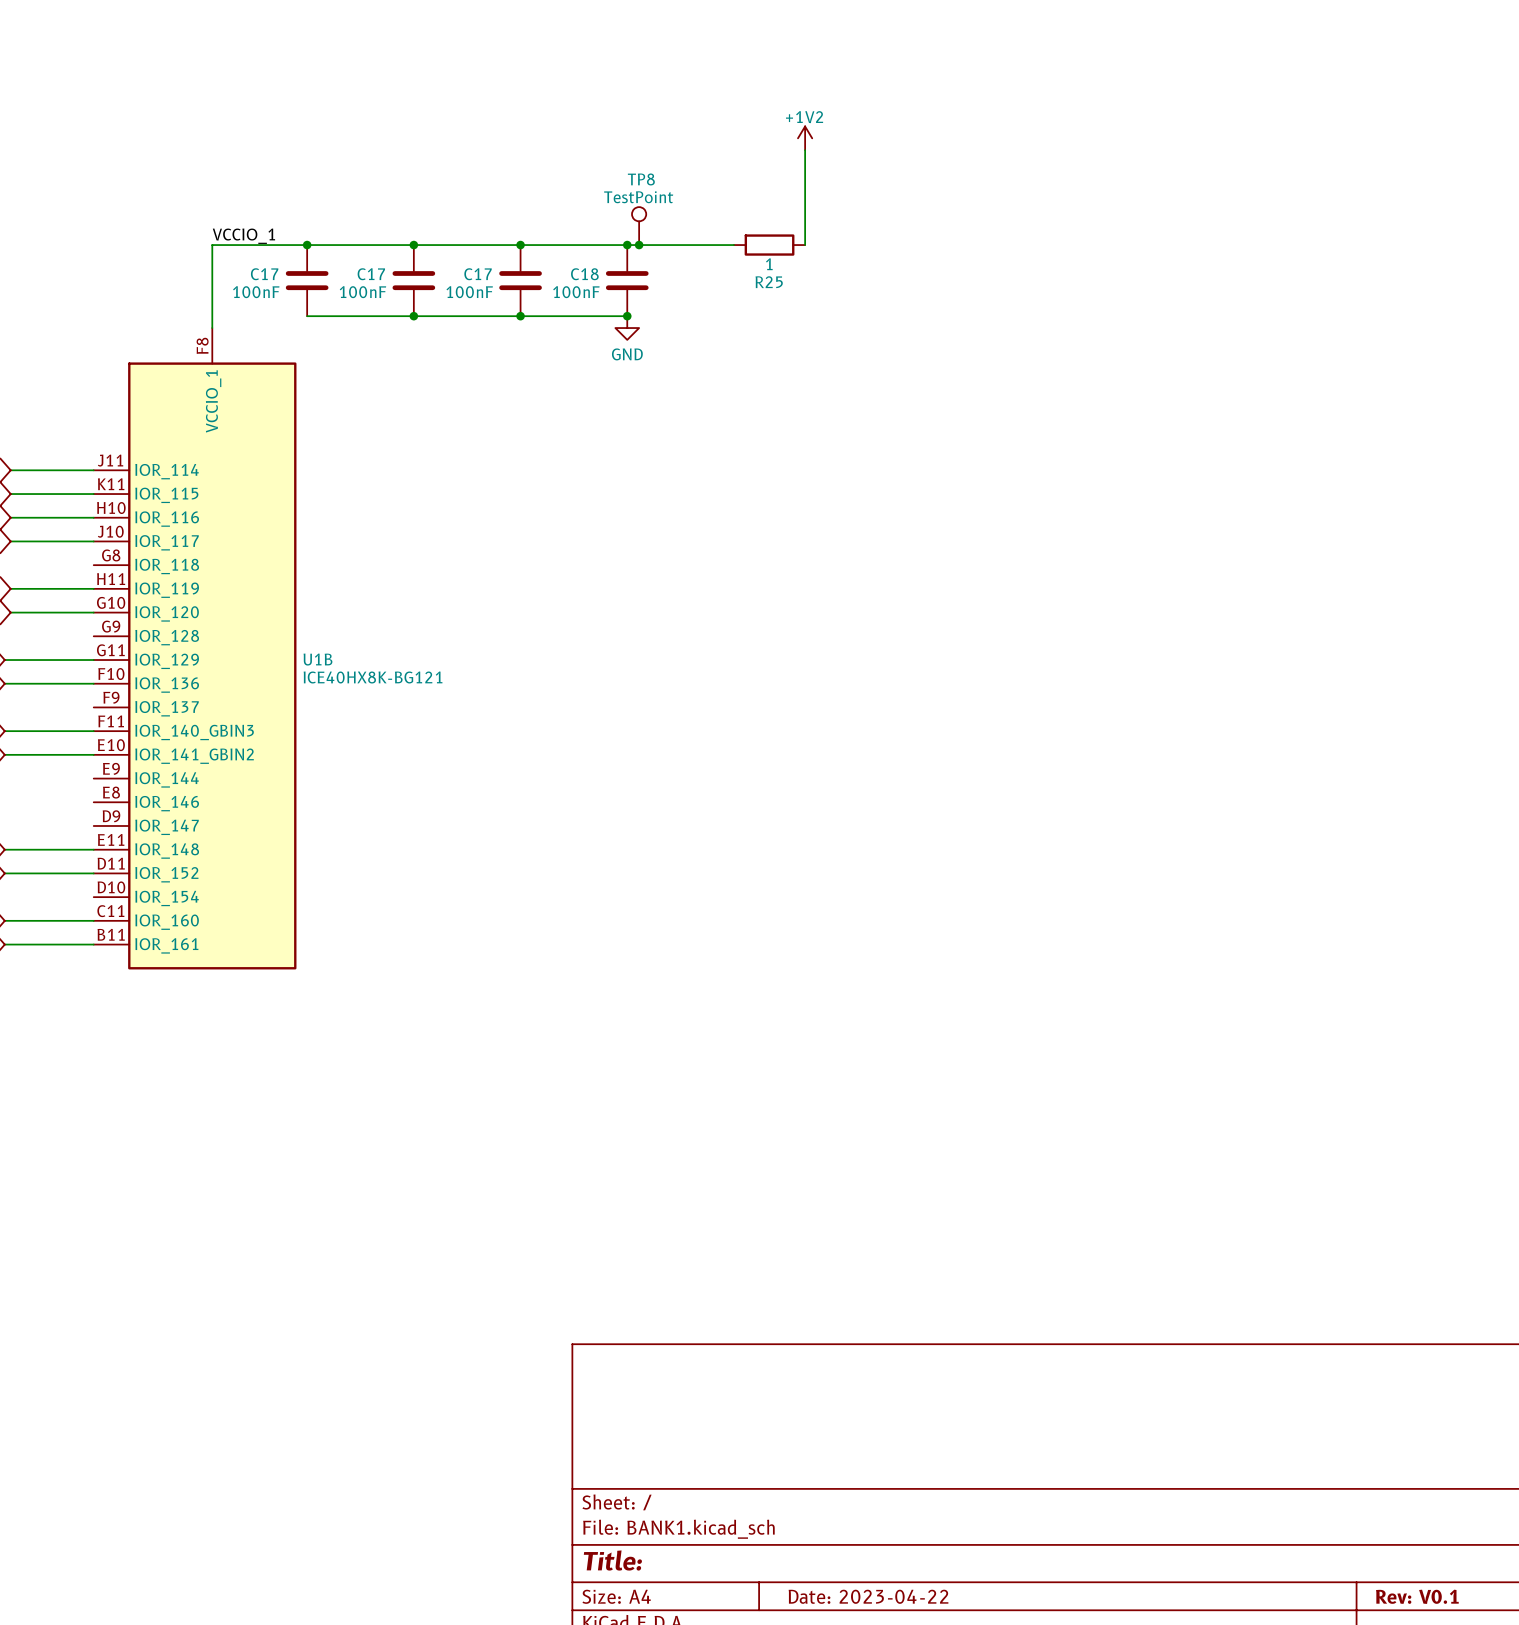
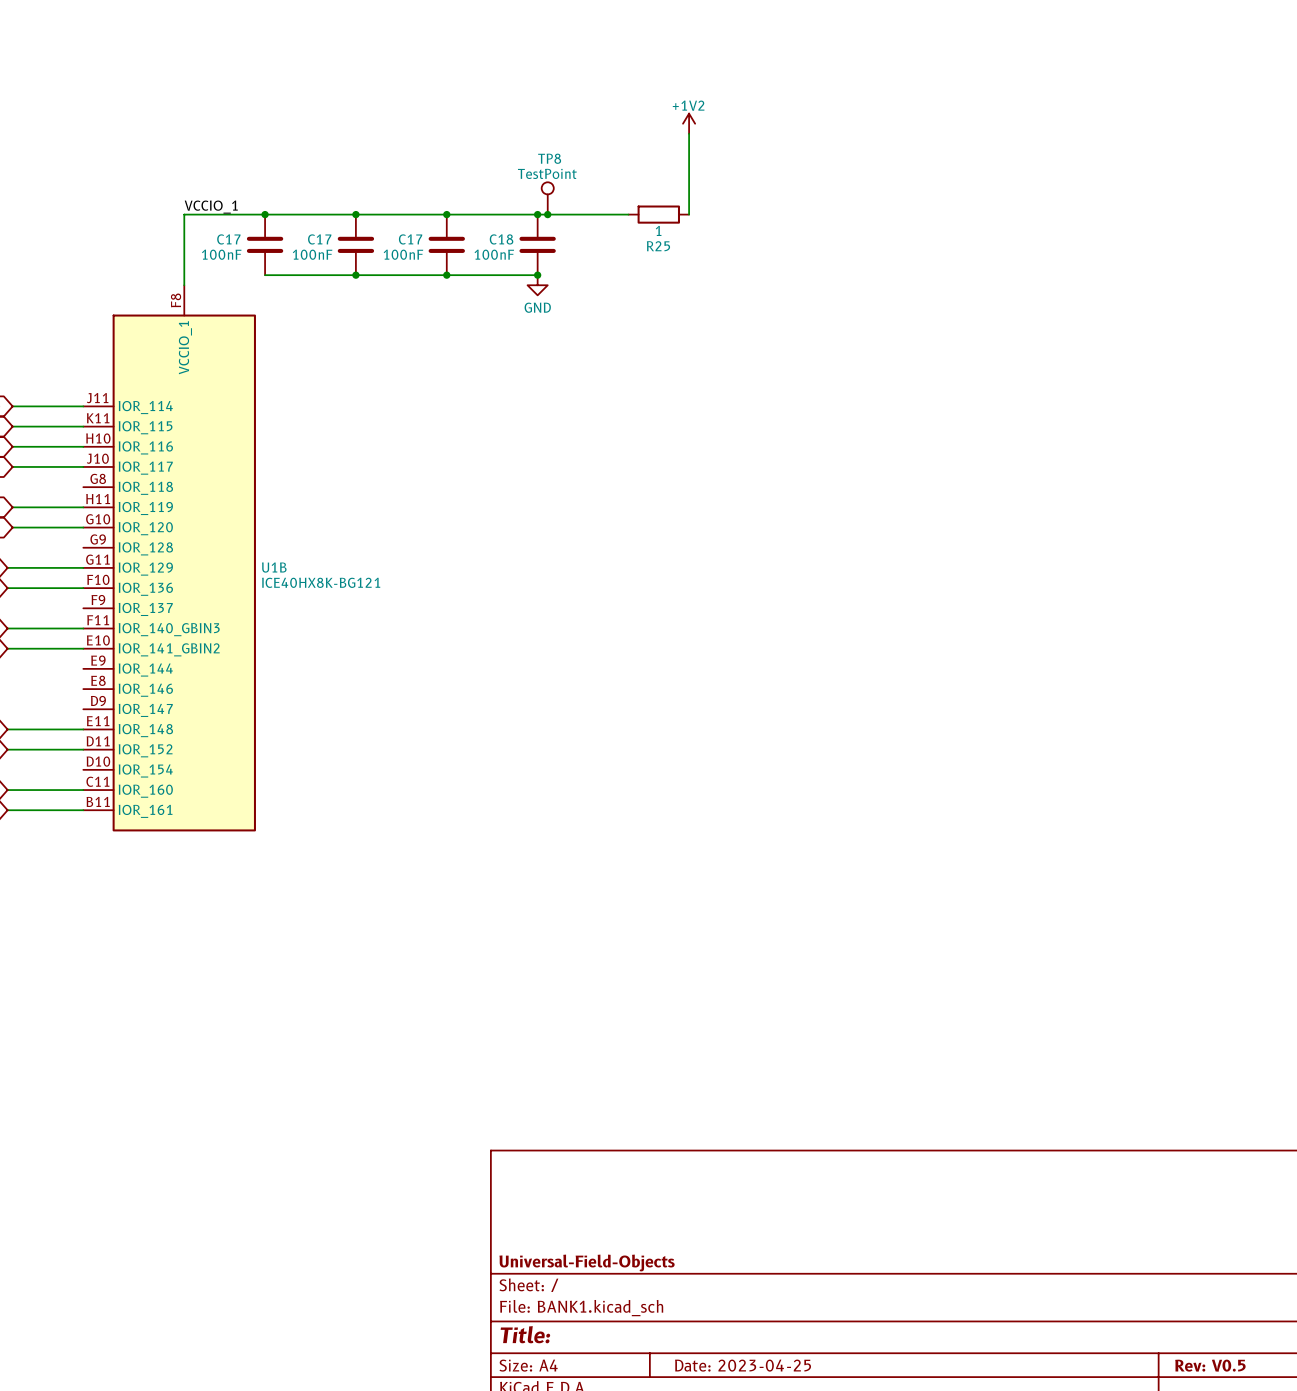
title block: none -> Universal-Field-Objects (587, 1262)
title block: Date: 2023-04-22 (868, 1596) -> Date: 2023-04-25 (743, 1365)
title block: Rev: V0.1 (1417, 1596) -> Rev: V0.5 (1210, 1365)

